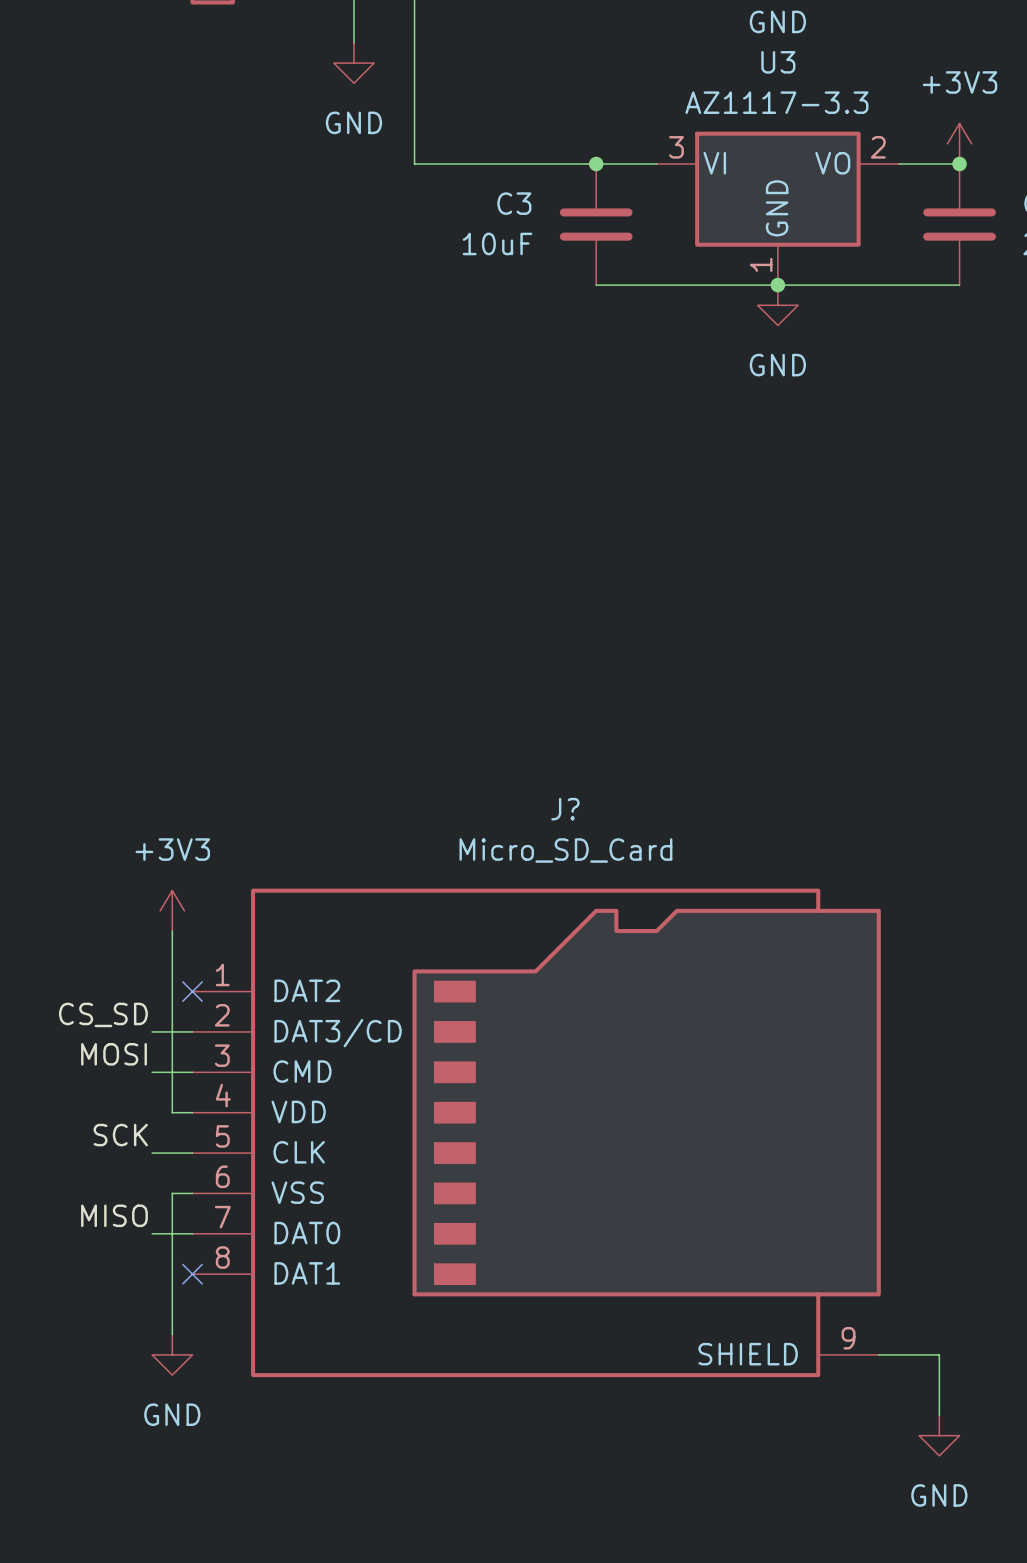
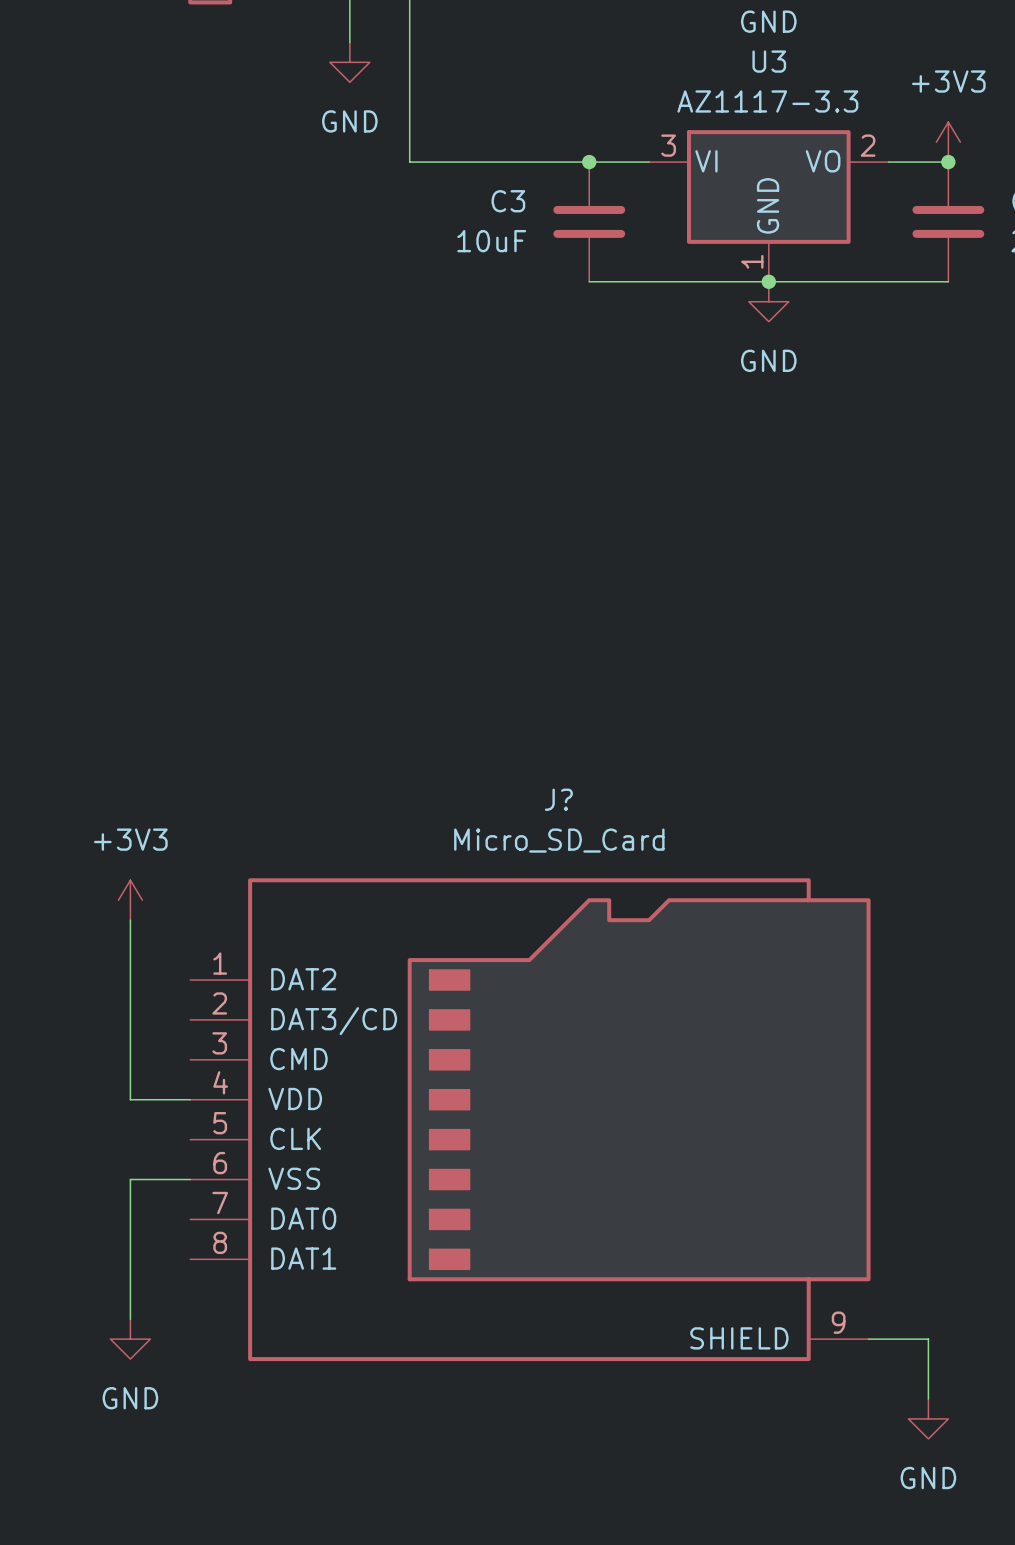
power symbol position: +3V3 (172, 910) -> +3V3 (130, 900)
wire: (172, 931) (172, 1112) -> (130, 920) (130, 1099) (170, 1099)
no-connect mark: (192, 991) -> none
label: CS_SD (103, 1014) -> none
wire: (152, 1031) (192, 1031) -> none
label: MOSI (114, 1054) -> none
wire: (152, 1072) (192, 1072) -> none
label: SCK (120, 1135) -> none
wire: (152, 1153) (192, 1153) -> none
wire: (172, 1193) (172, 1334) -> (170, 1179) (130, 1179) (130, 1319)
label: MISO (114, 1215) -> none
wire: (152, 1233) (192, 1233) -> none
no-connect mark: (192, 1274) -> none
power symbol position: GND (172, 1354) -> GND (130, 1339)

